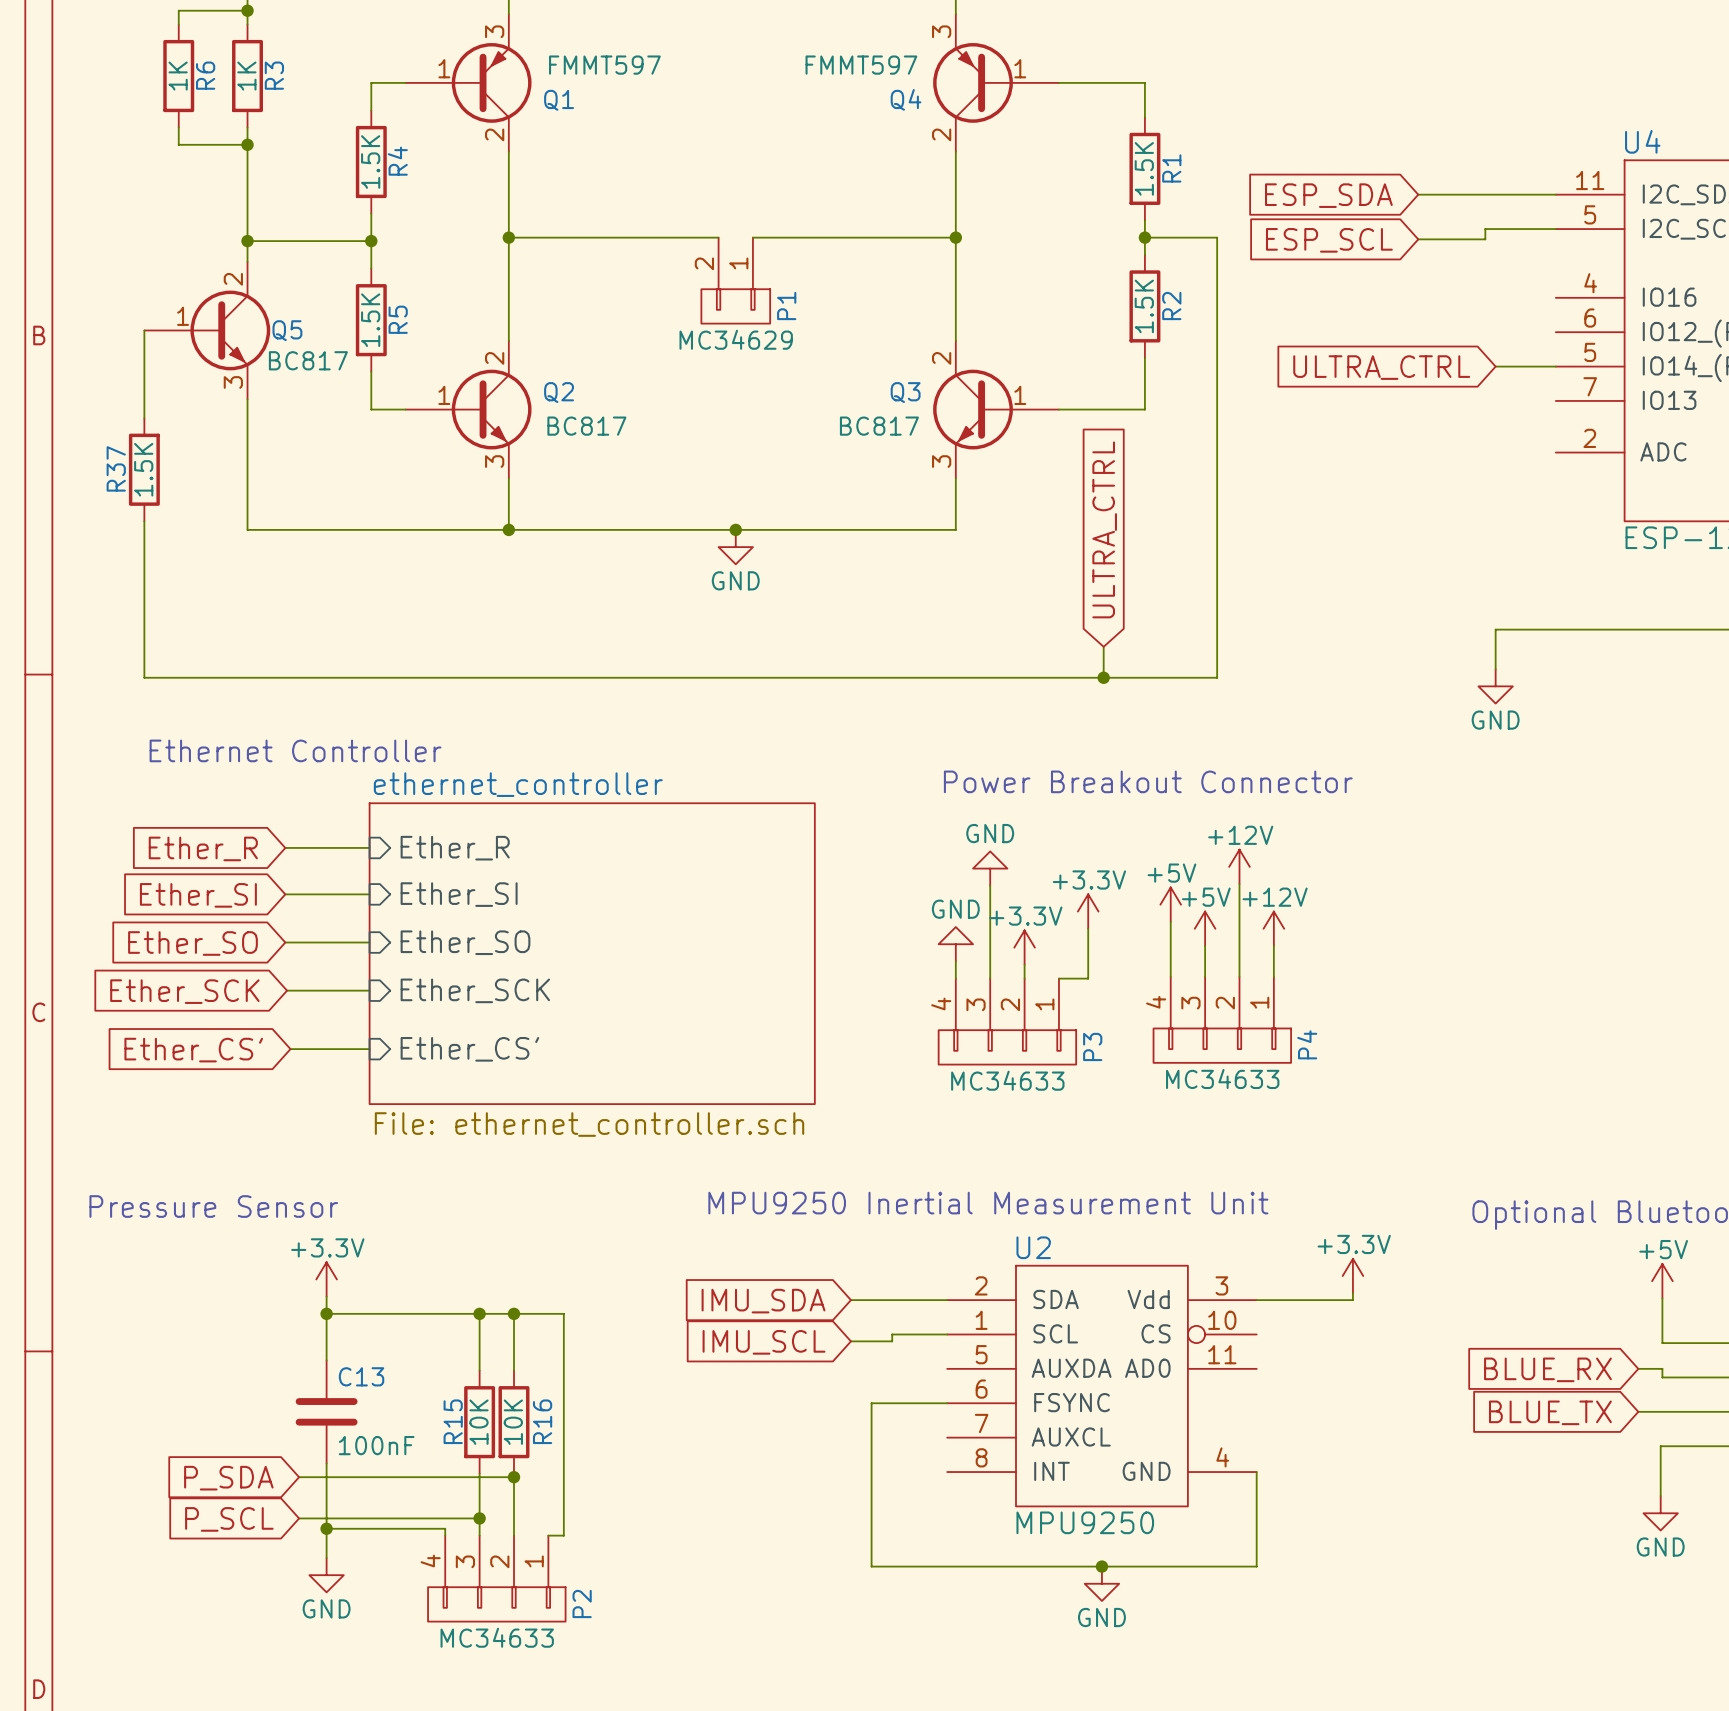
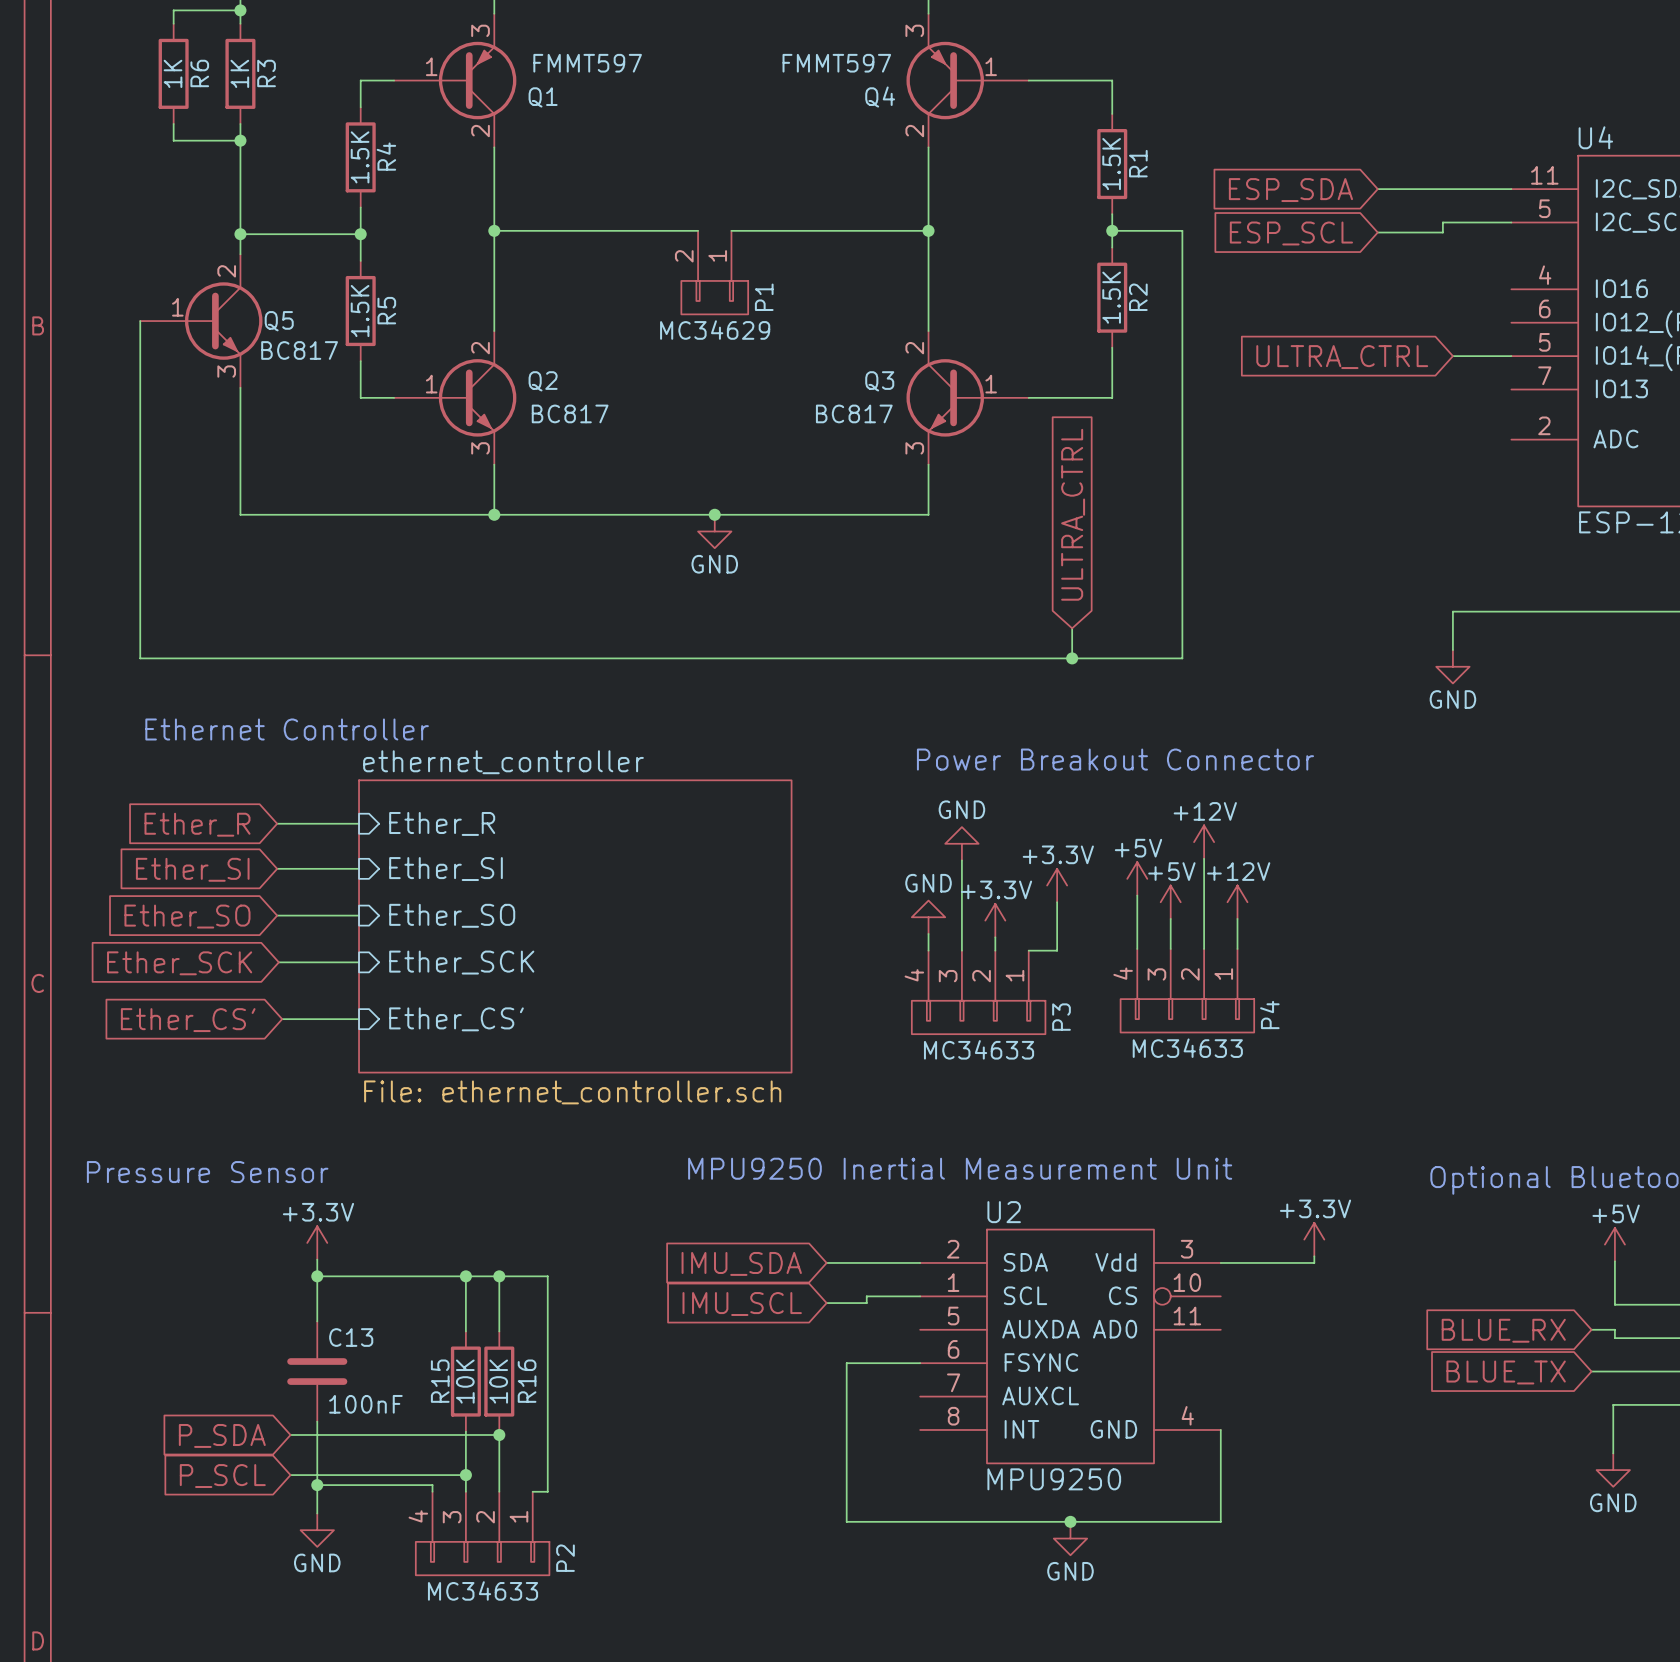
wire: none -> (140, 406) (140, 506)
R37: 1.5K (144, 469) -> none

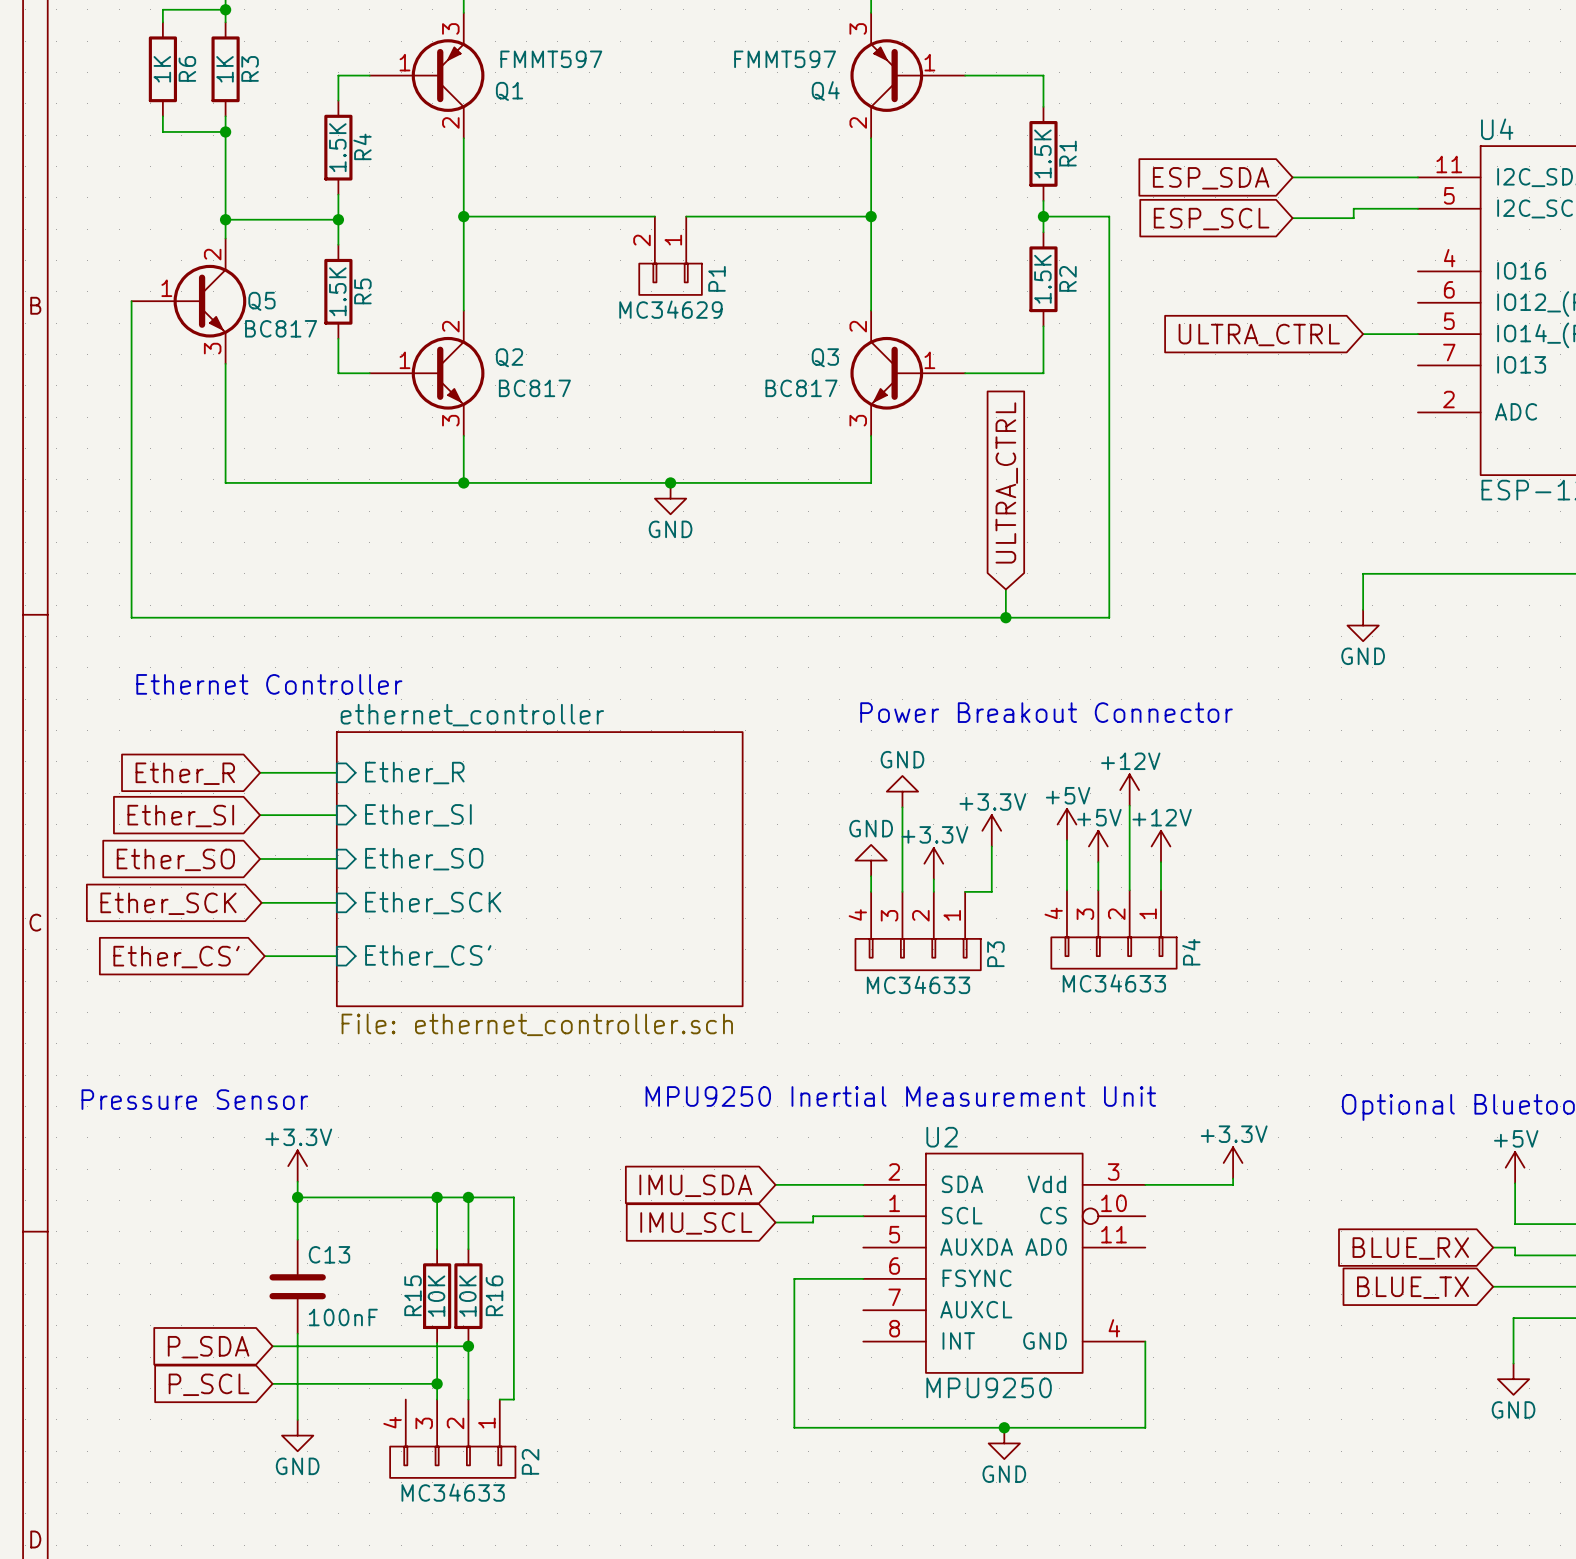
wire: (317, 1485) (432, 1485) (432, 1491) -> none
junction: (317, 1485) -> none

